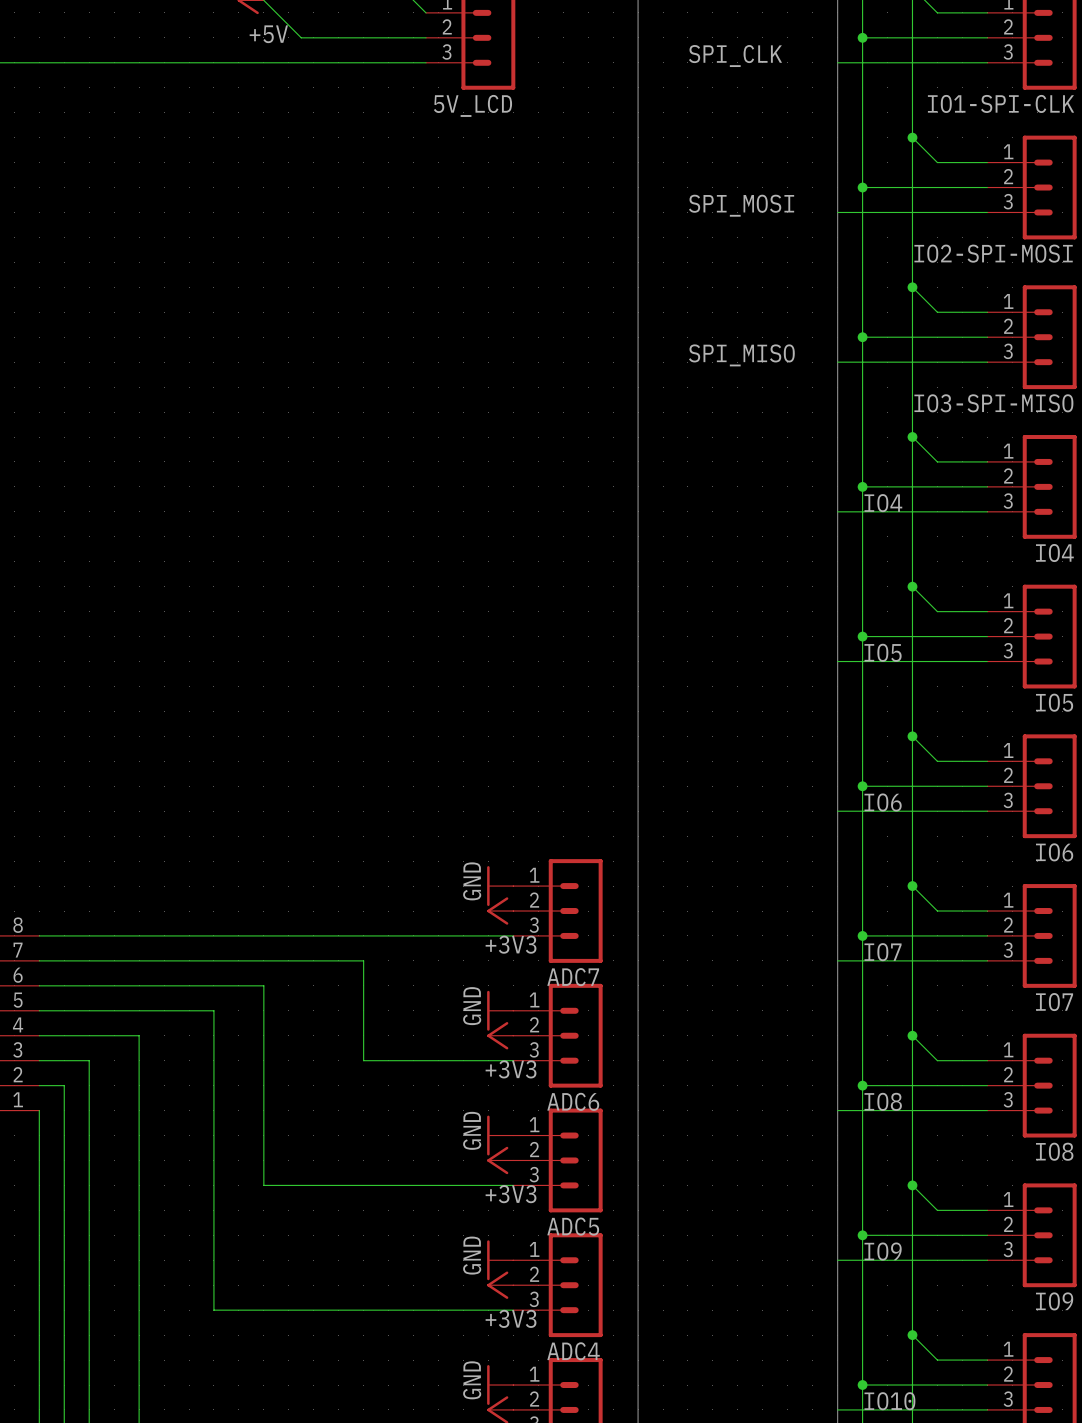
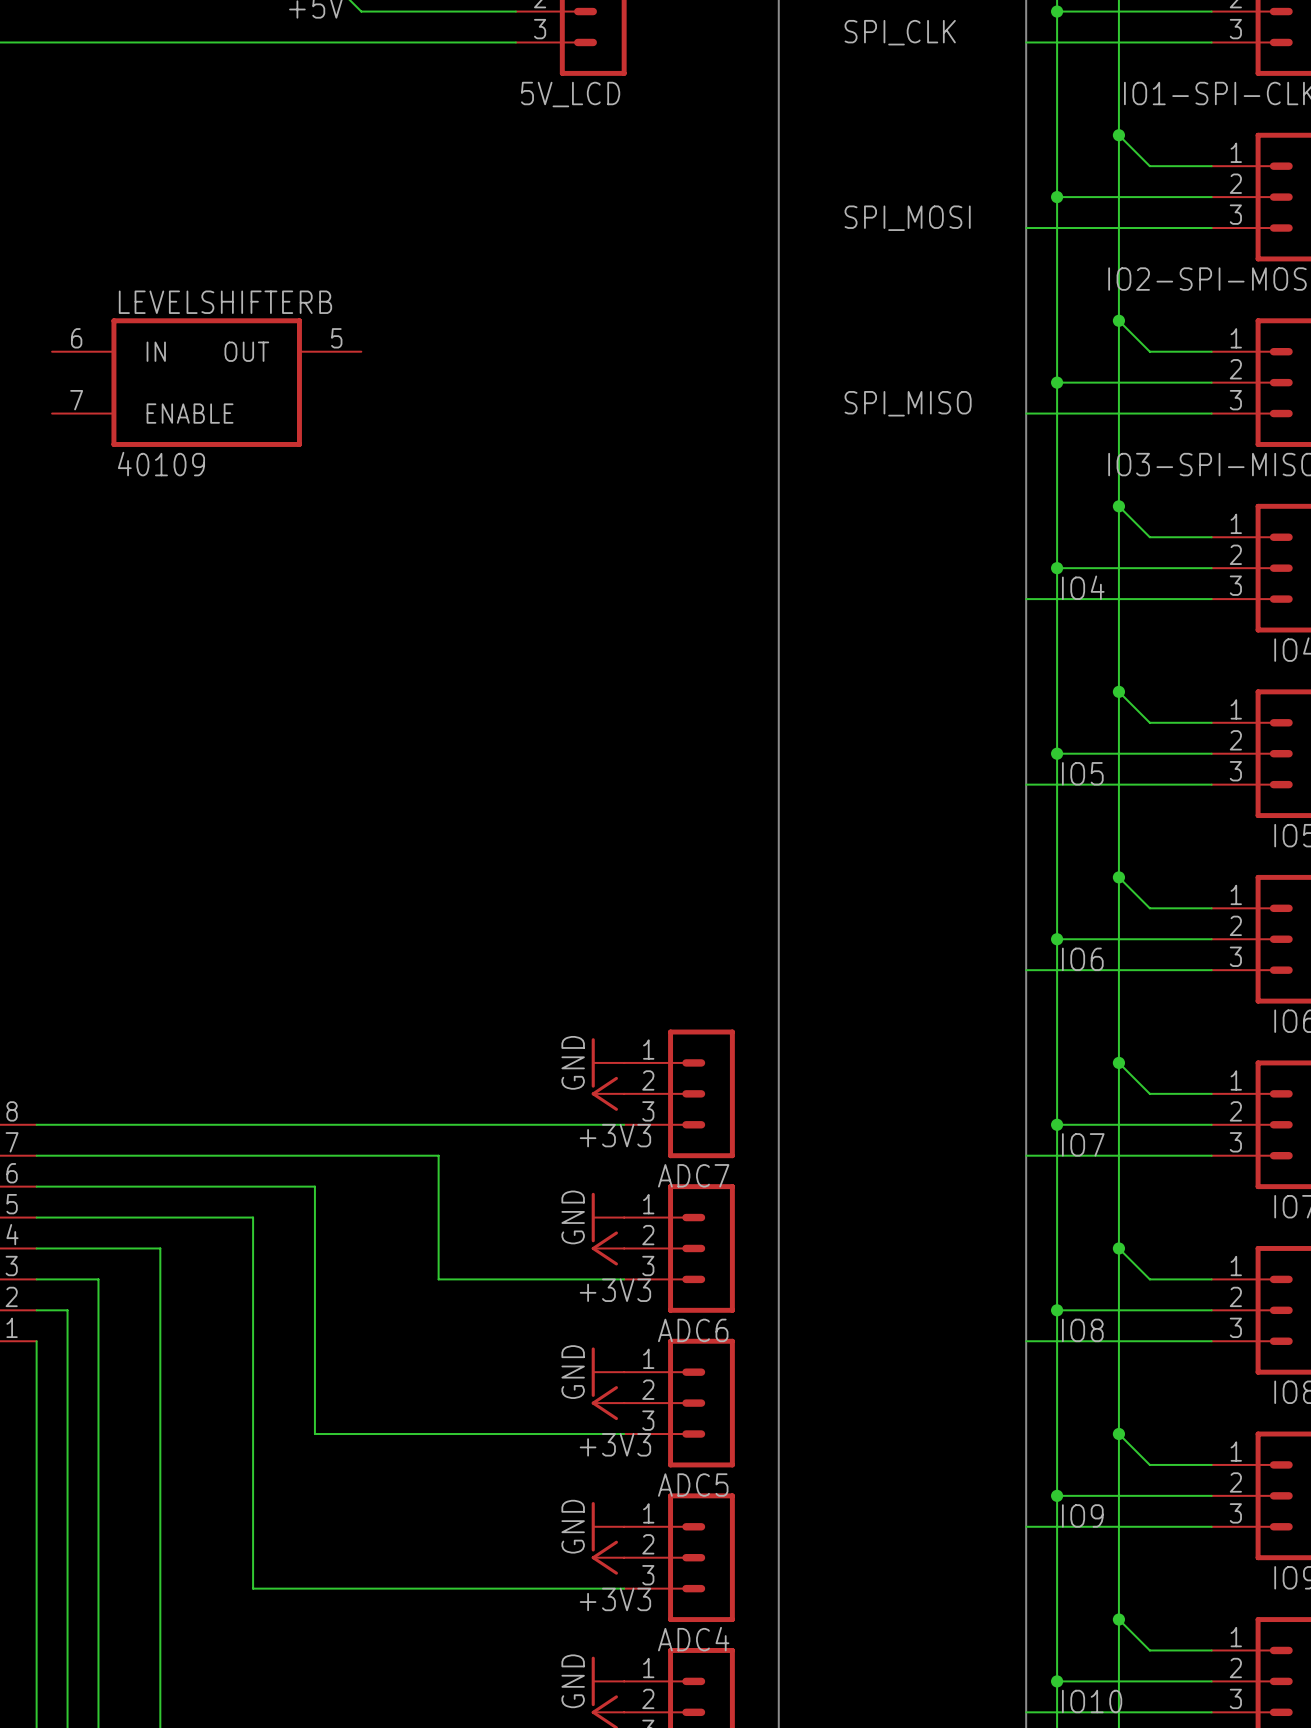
LEVELSHIFTERB: none -> 40109 (206, 382)

